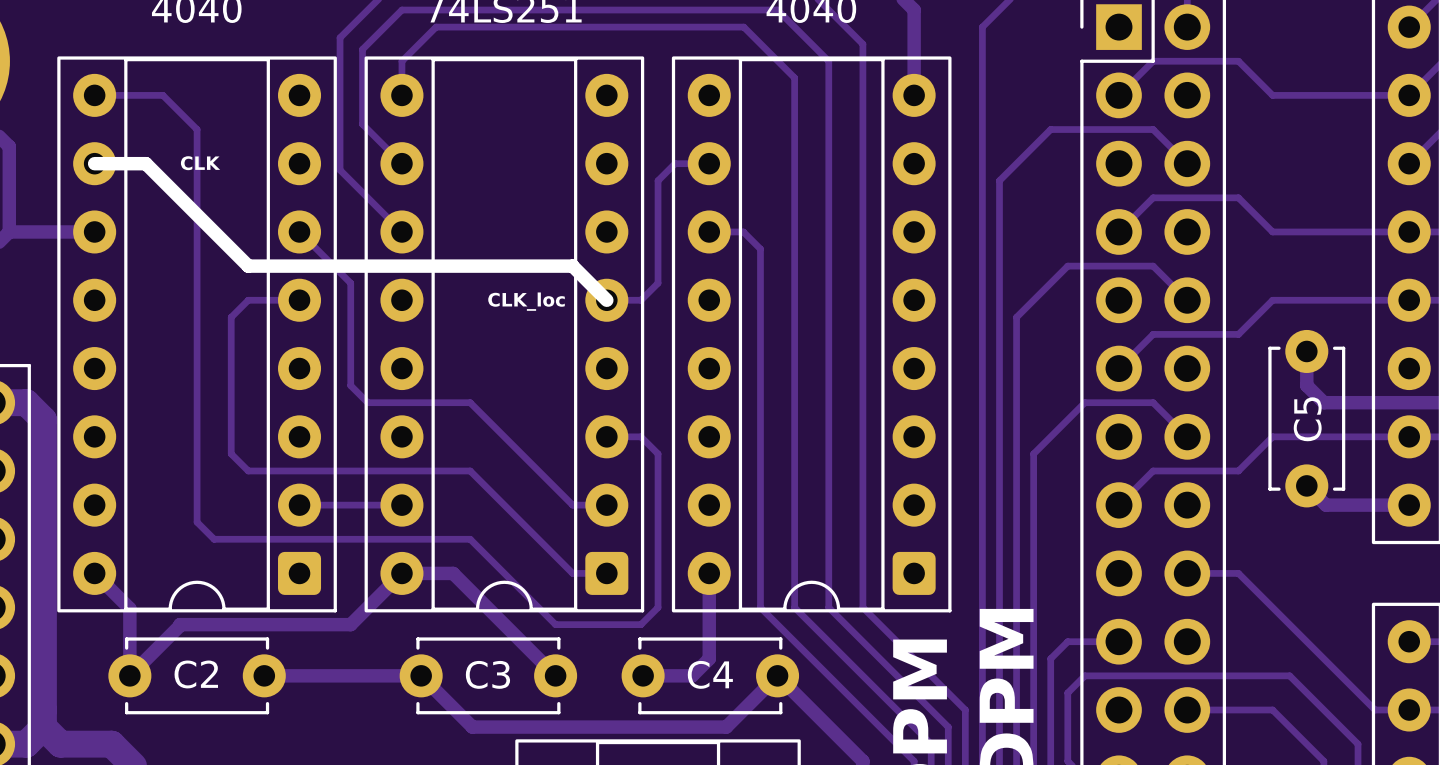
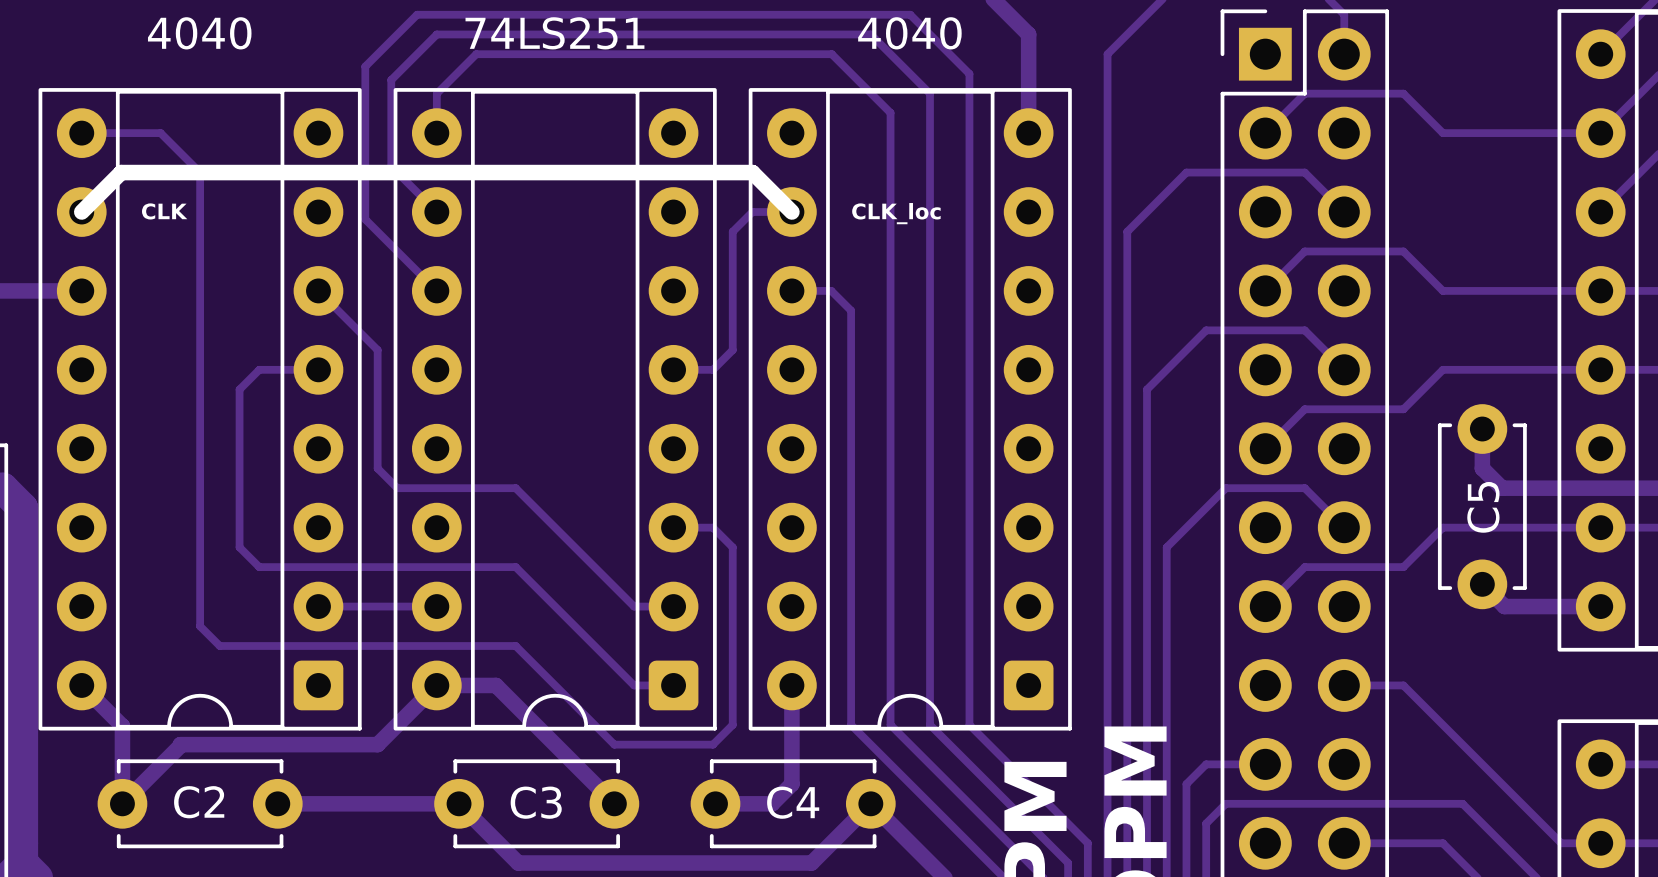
line: (94, 163) (145, 163) (248, 266) (572, 266) (606, 300) -> (81, 212) (121, 172) (752, 172) (791, 212)
text position: CLK (200, 163) -> CLK (164, 211)
text position: CLK_loc (526, 301) -> CLK_loc (896, 213)

